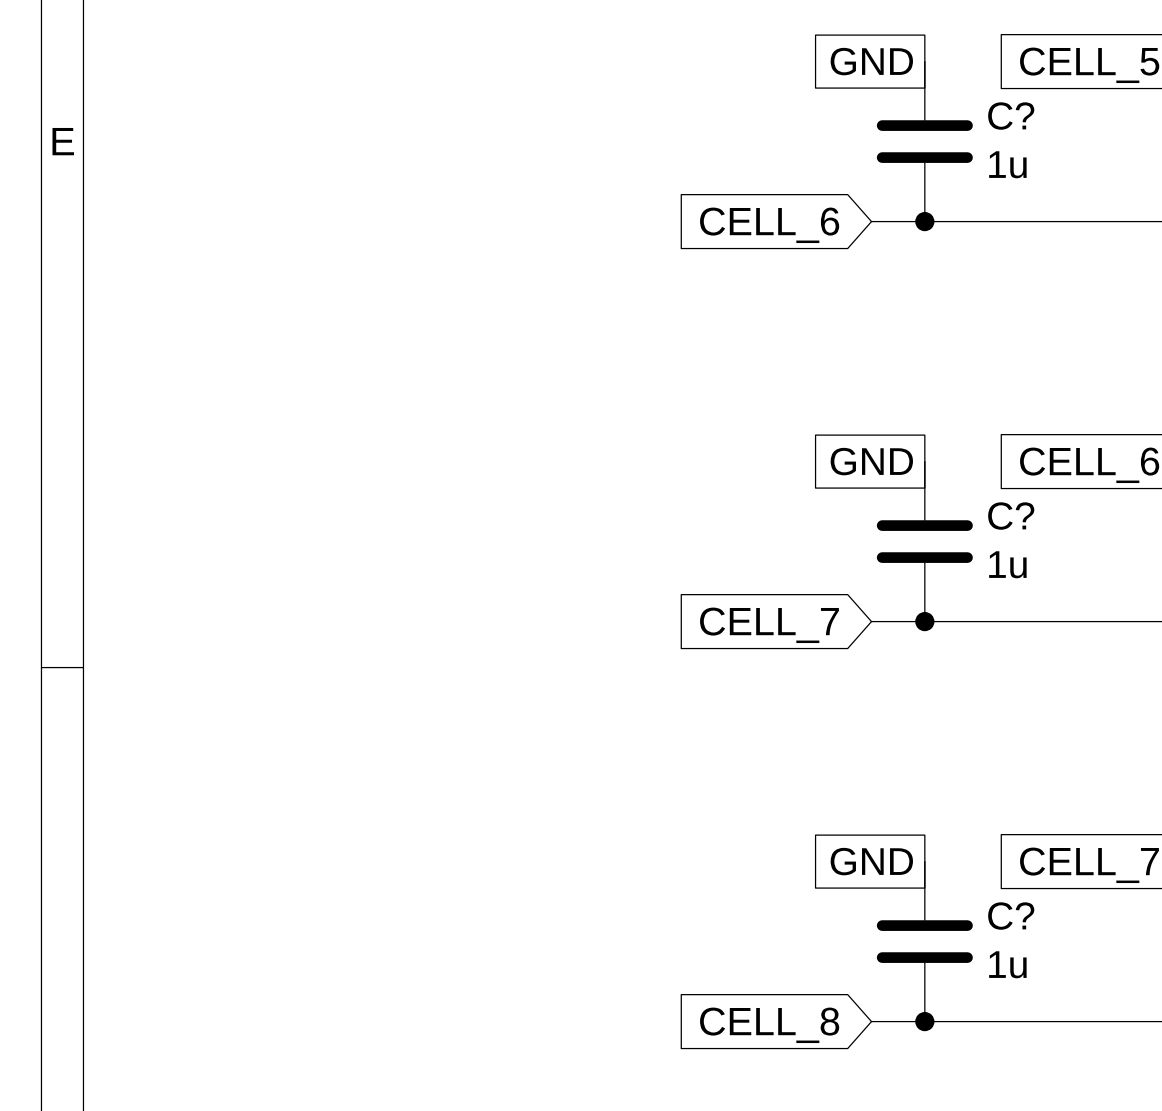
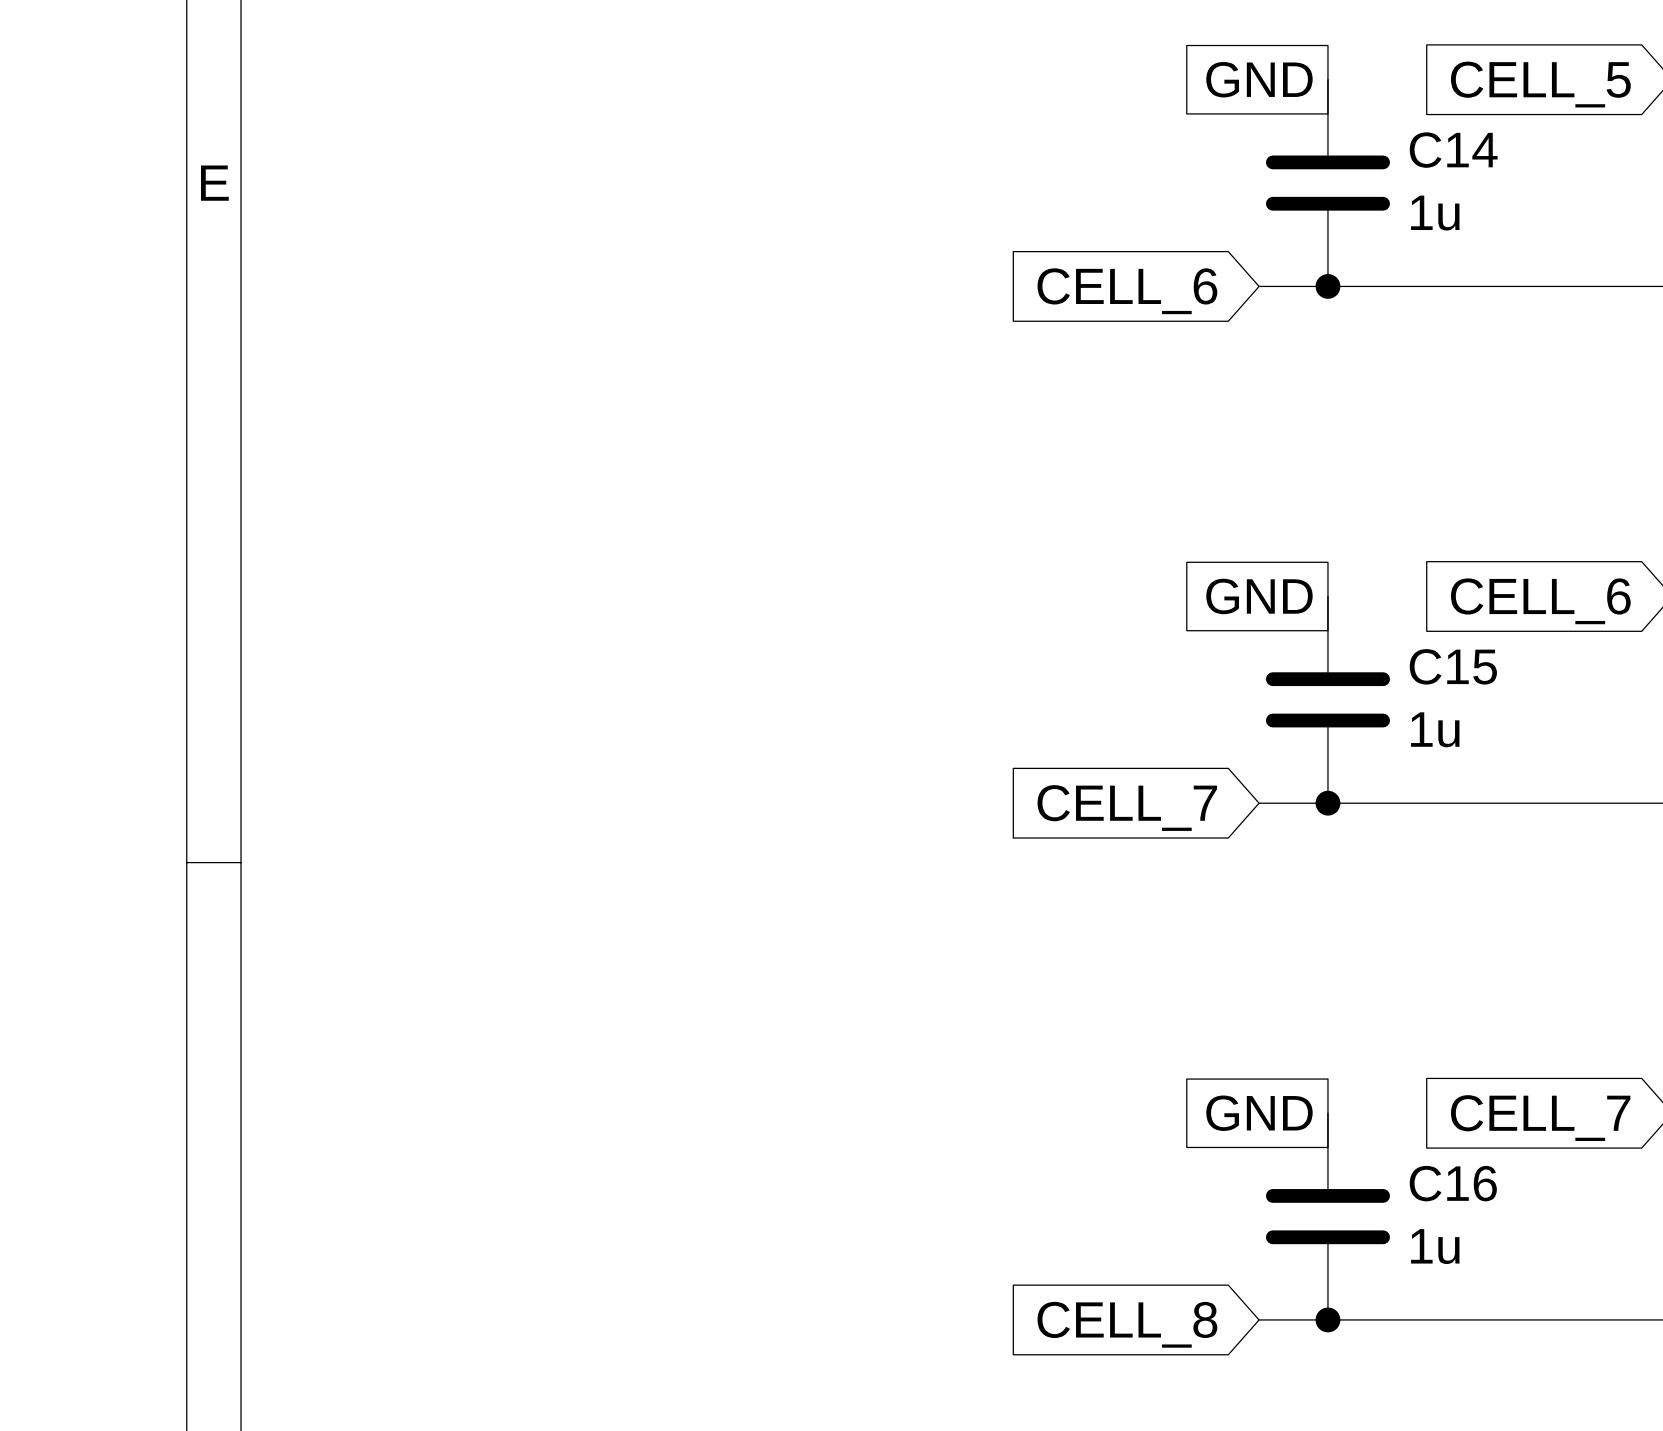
C? name: C? (1011, 116) -> C14 (1453, 150)
C? name: C? (1011, 516) -> C15 (1453, 666)
C? name: C? (1011, 916) -> C16 (1453, 1183)

